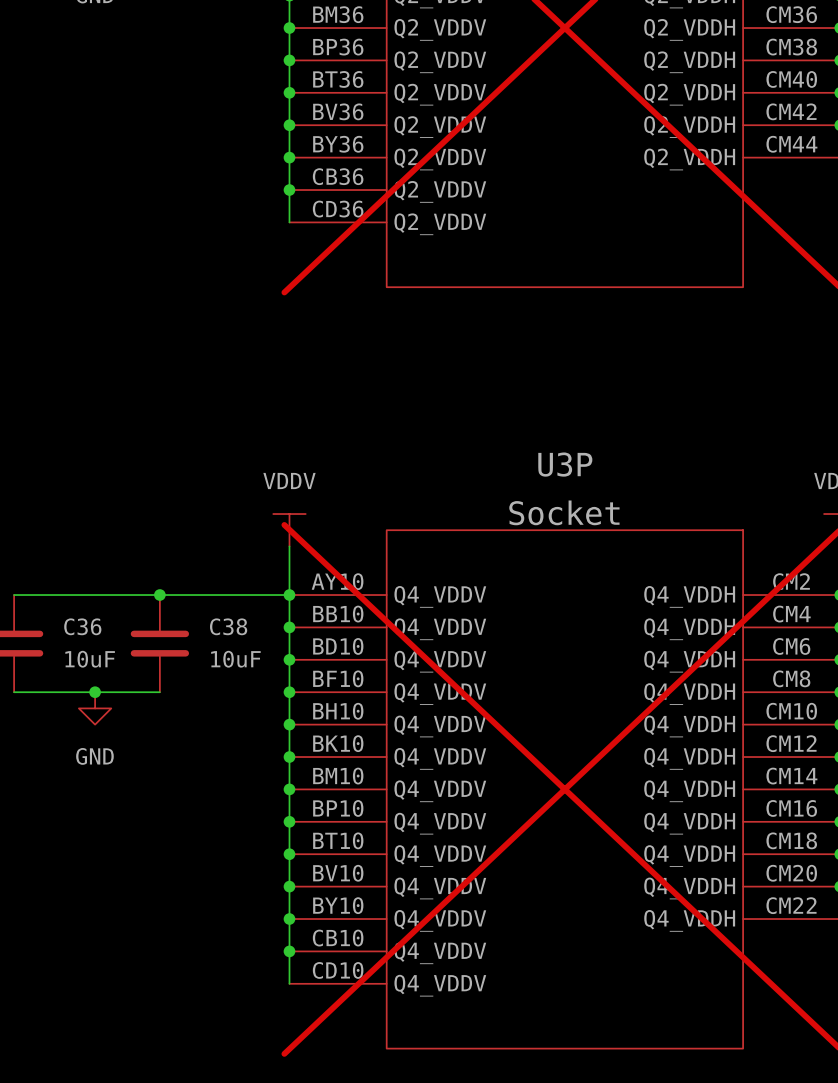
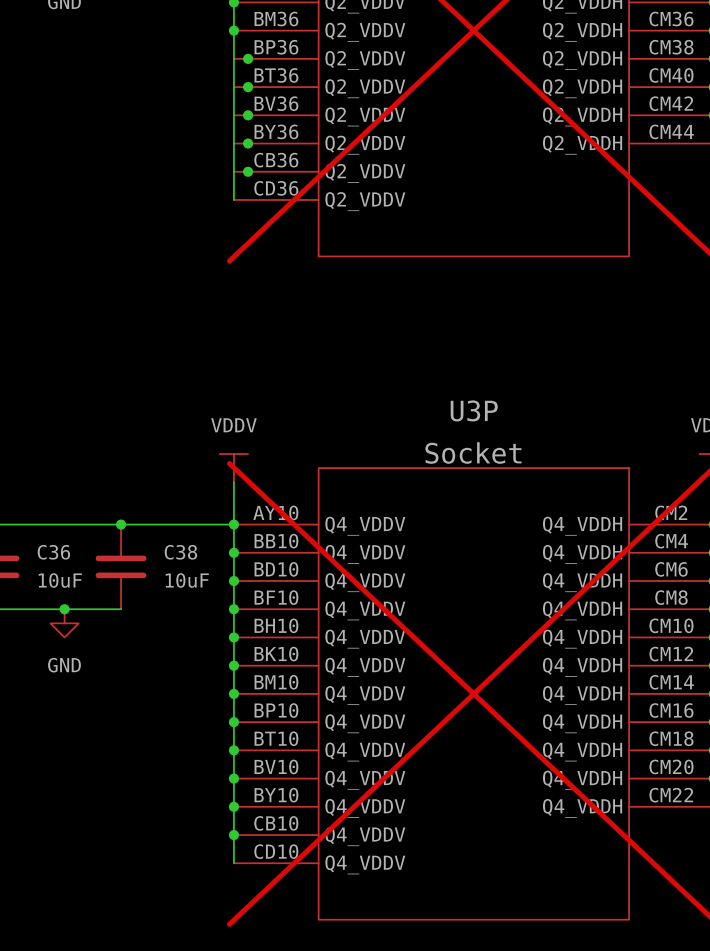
junction position: (289, 60) -> (248, 58)
junction position: (289, 92) -> (248, 87)
junction position: (289, 125) -> (248, 115)
junction position: (289, 157) -> (248, 143)
junction position: (289, 190) -> (248, 171)

